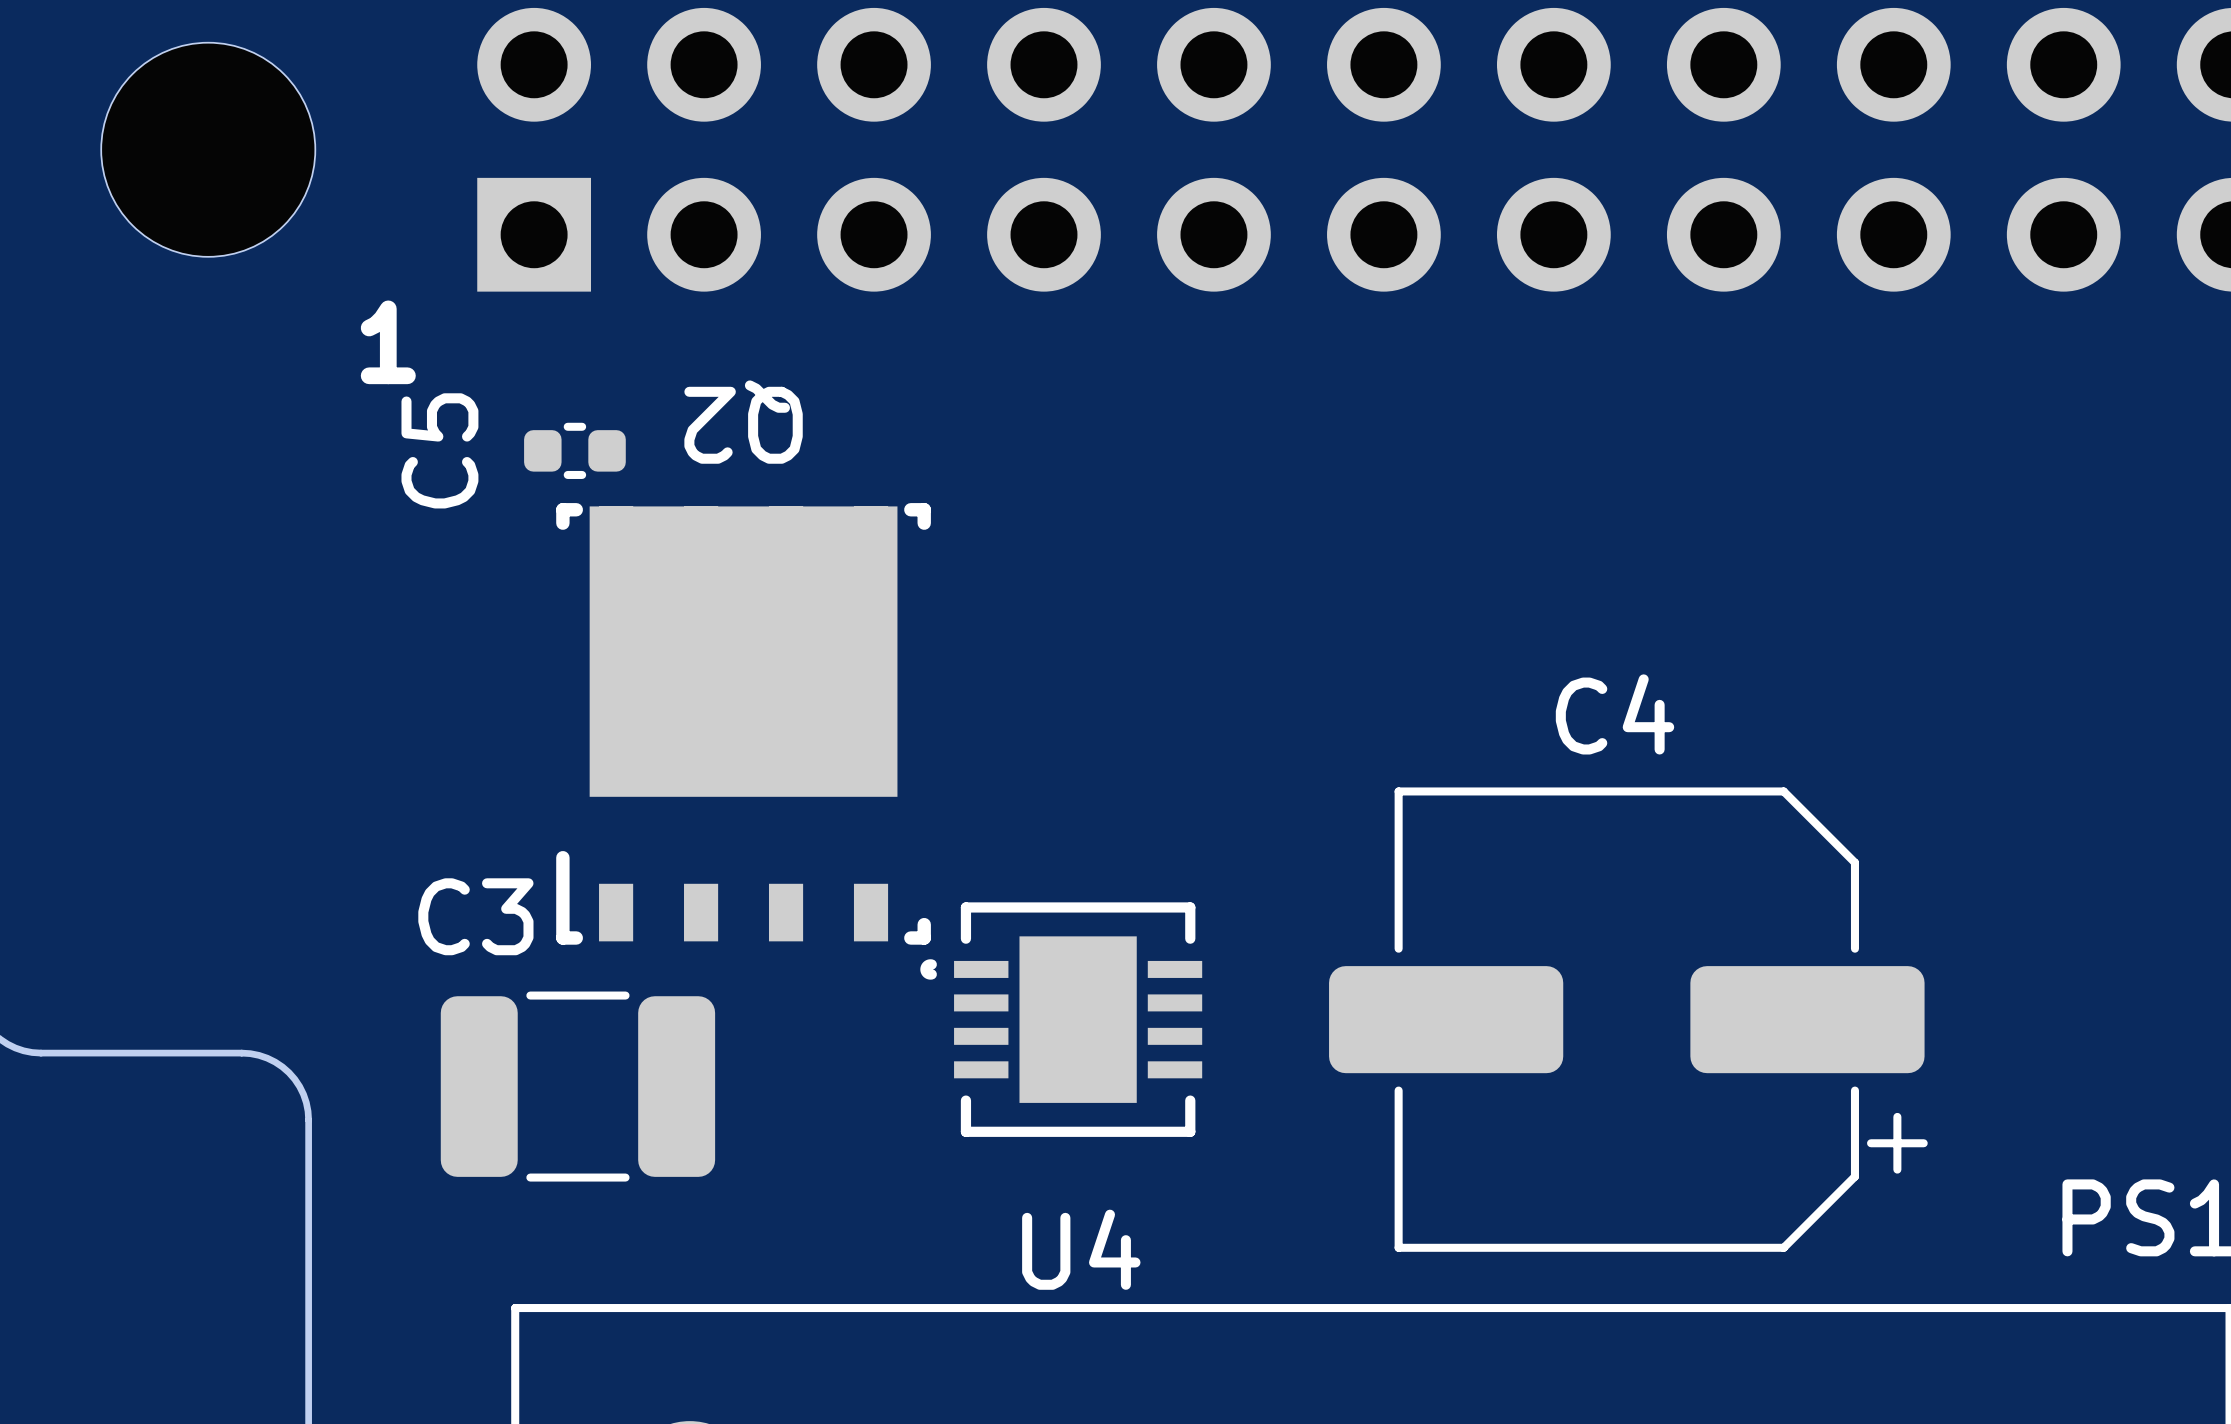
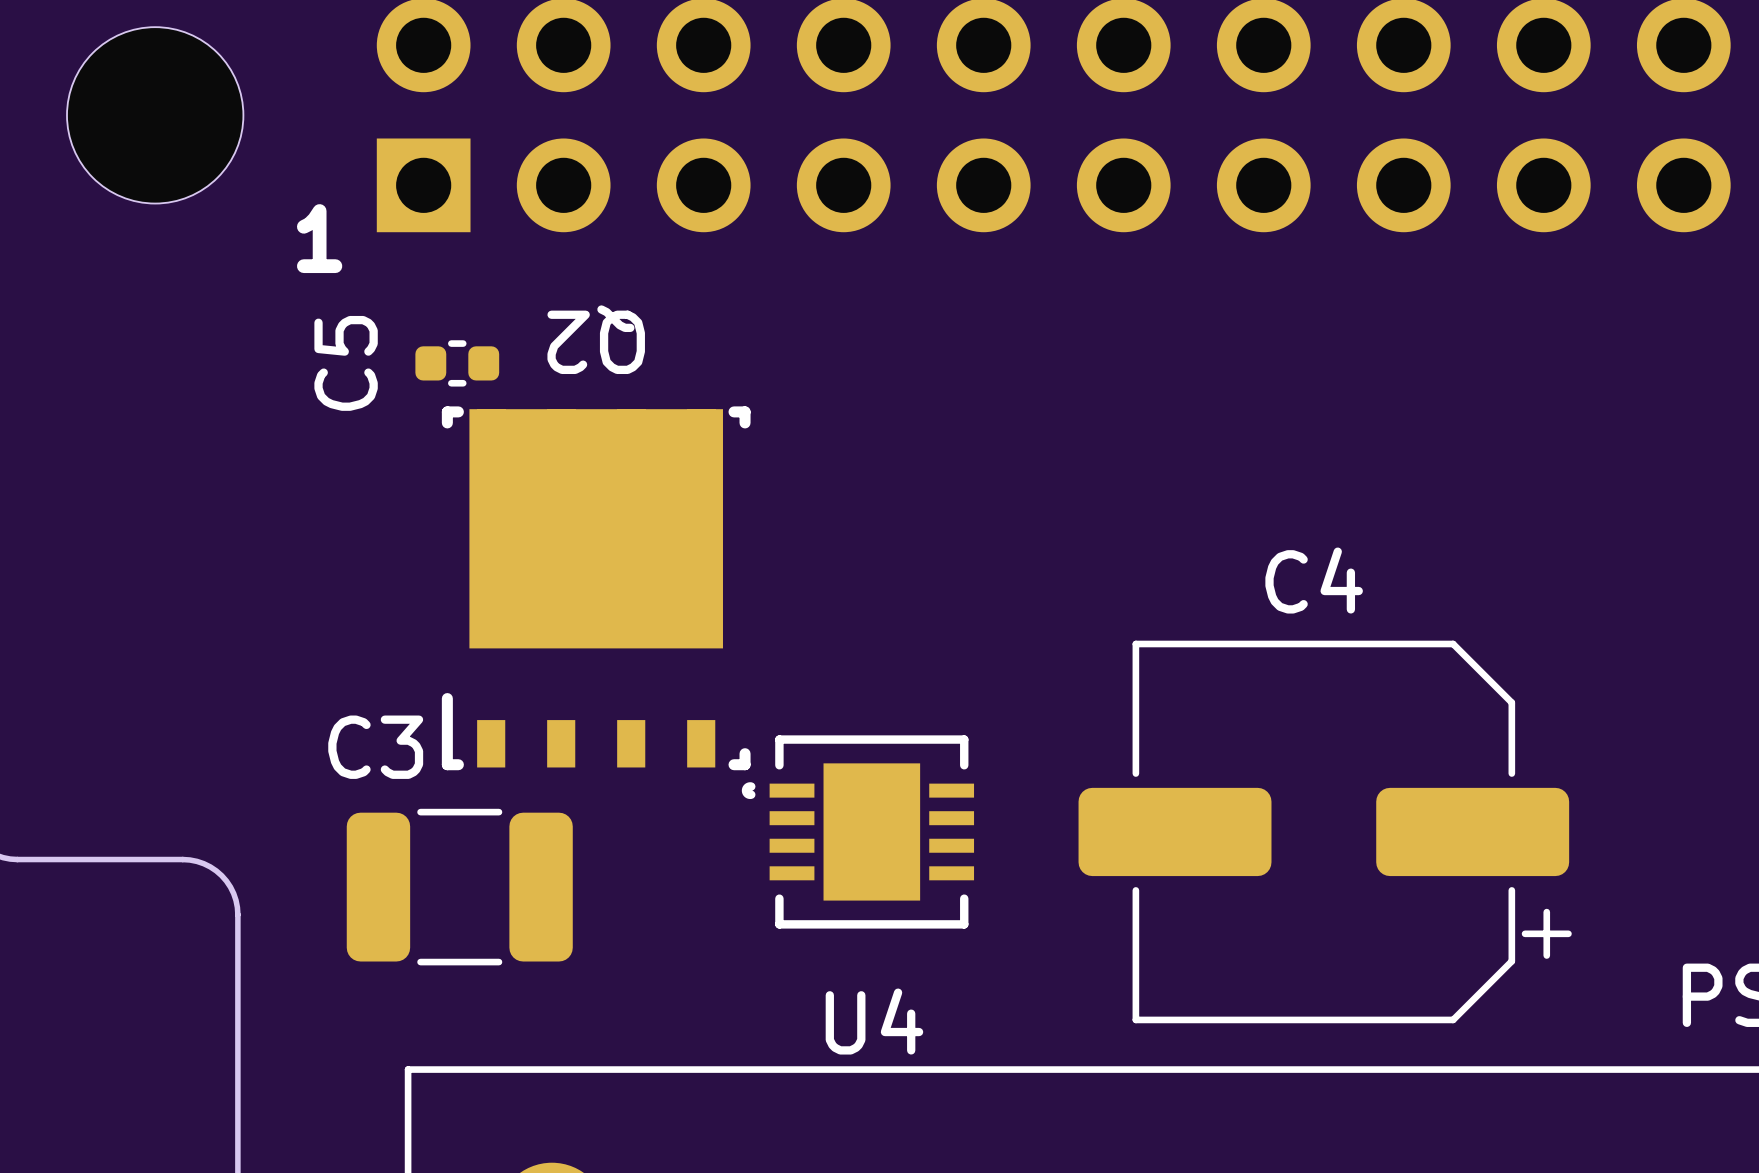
text position: 1 (388, 342) -> 1 (319, 238)

